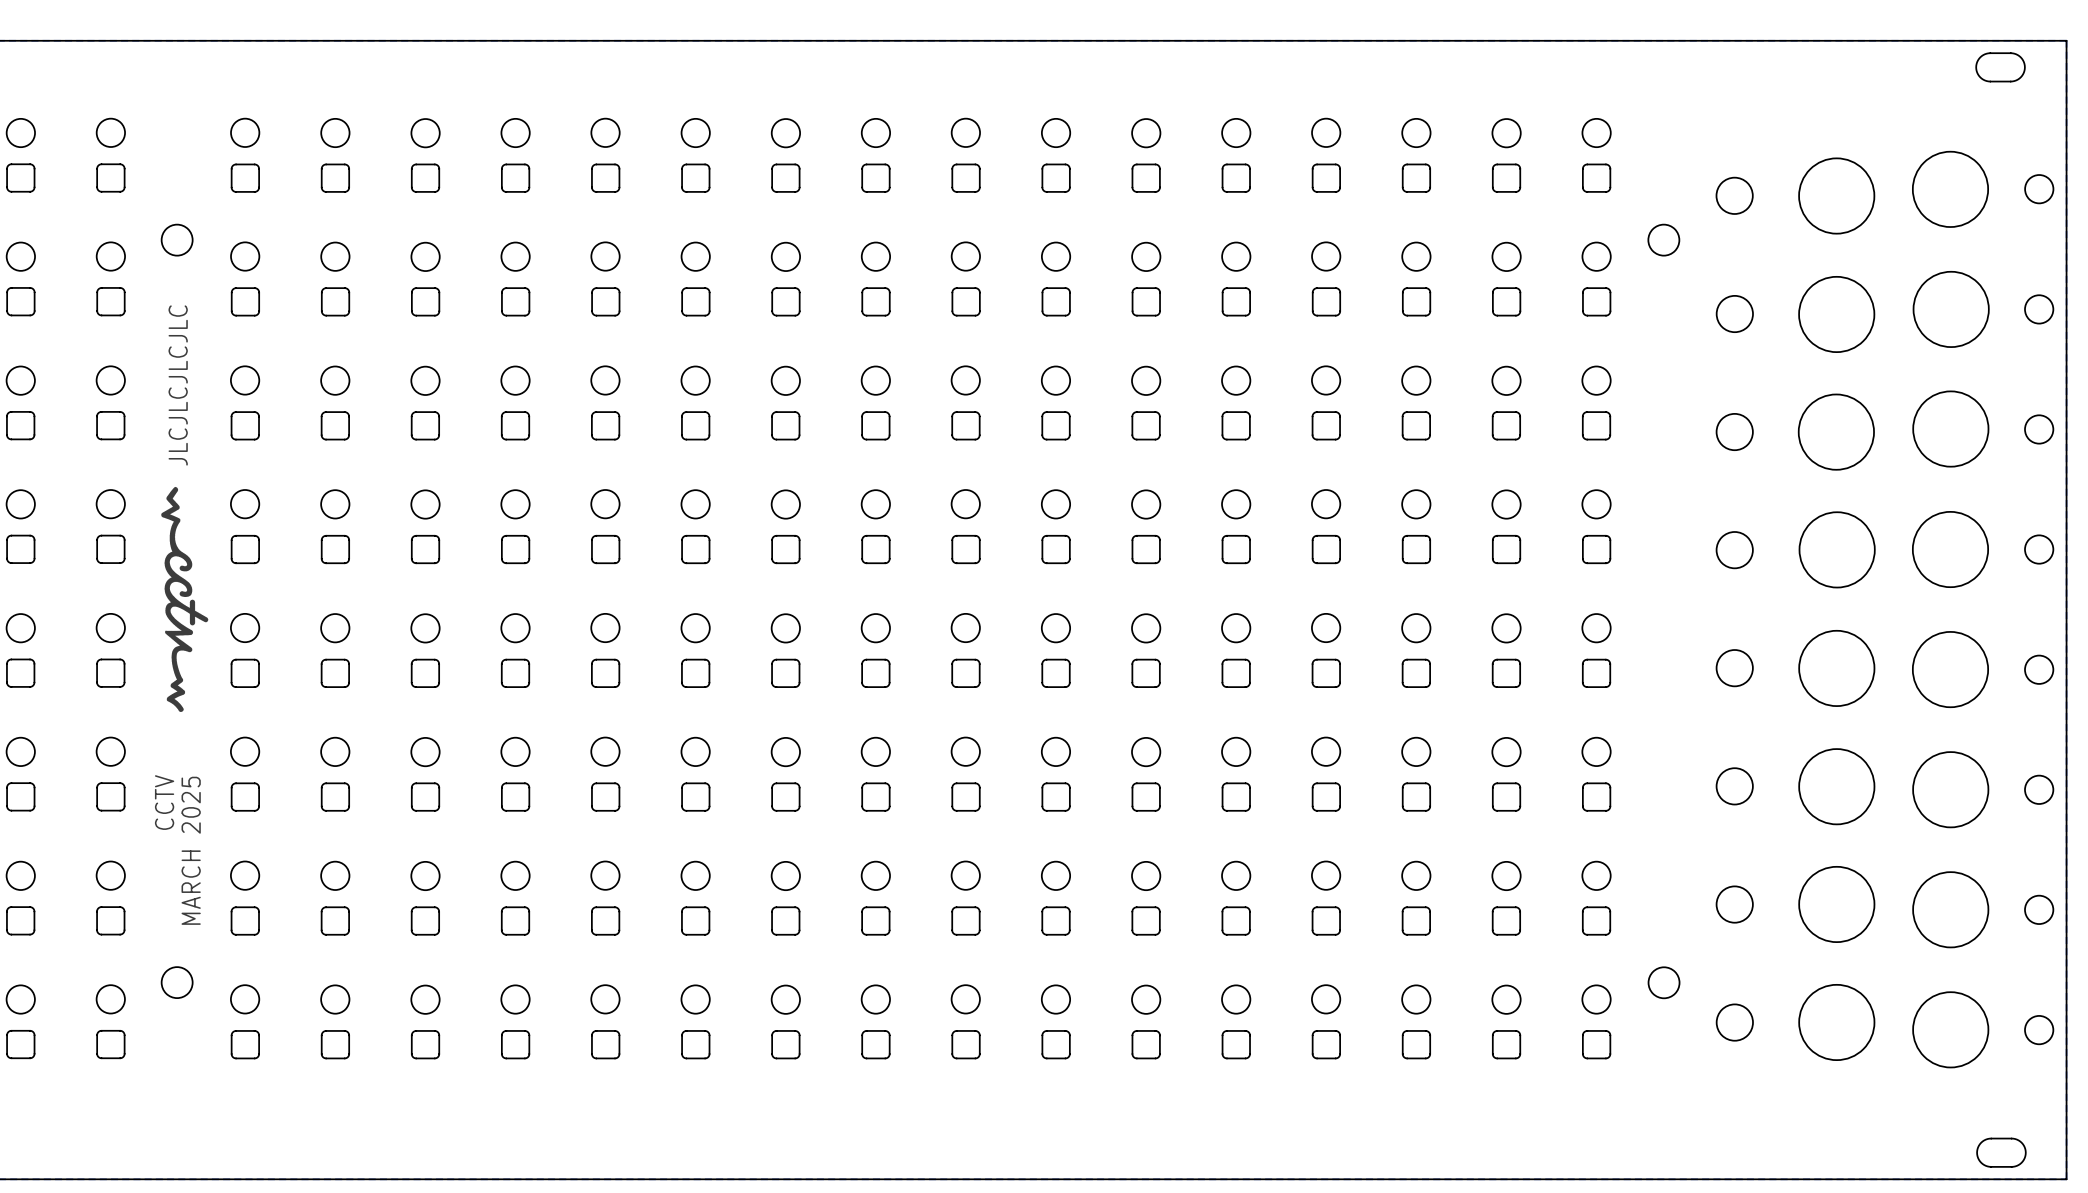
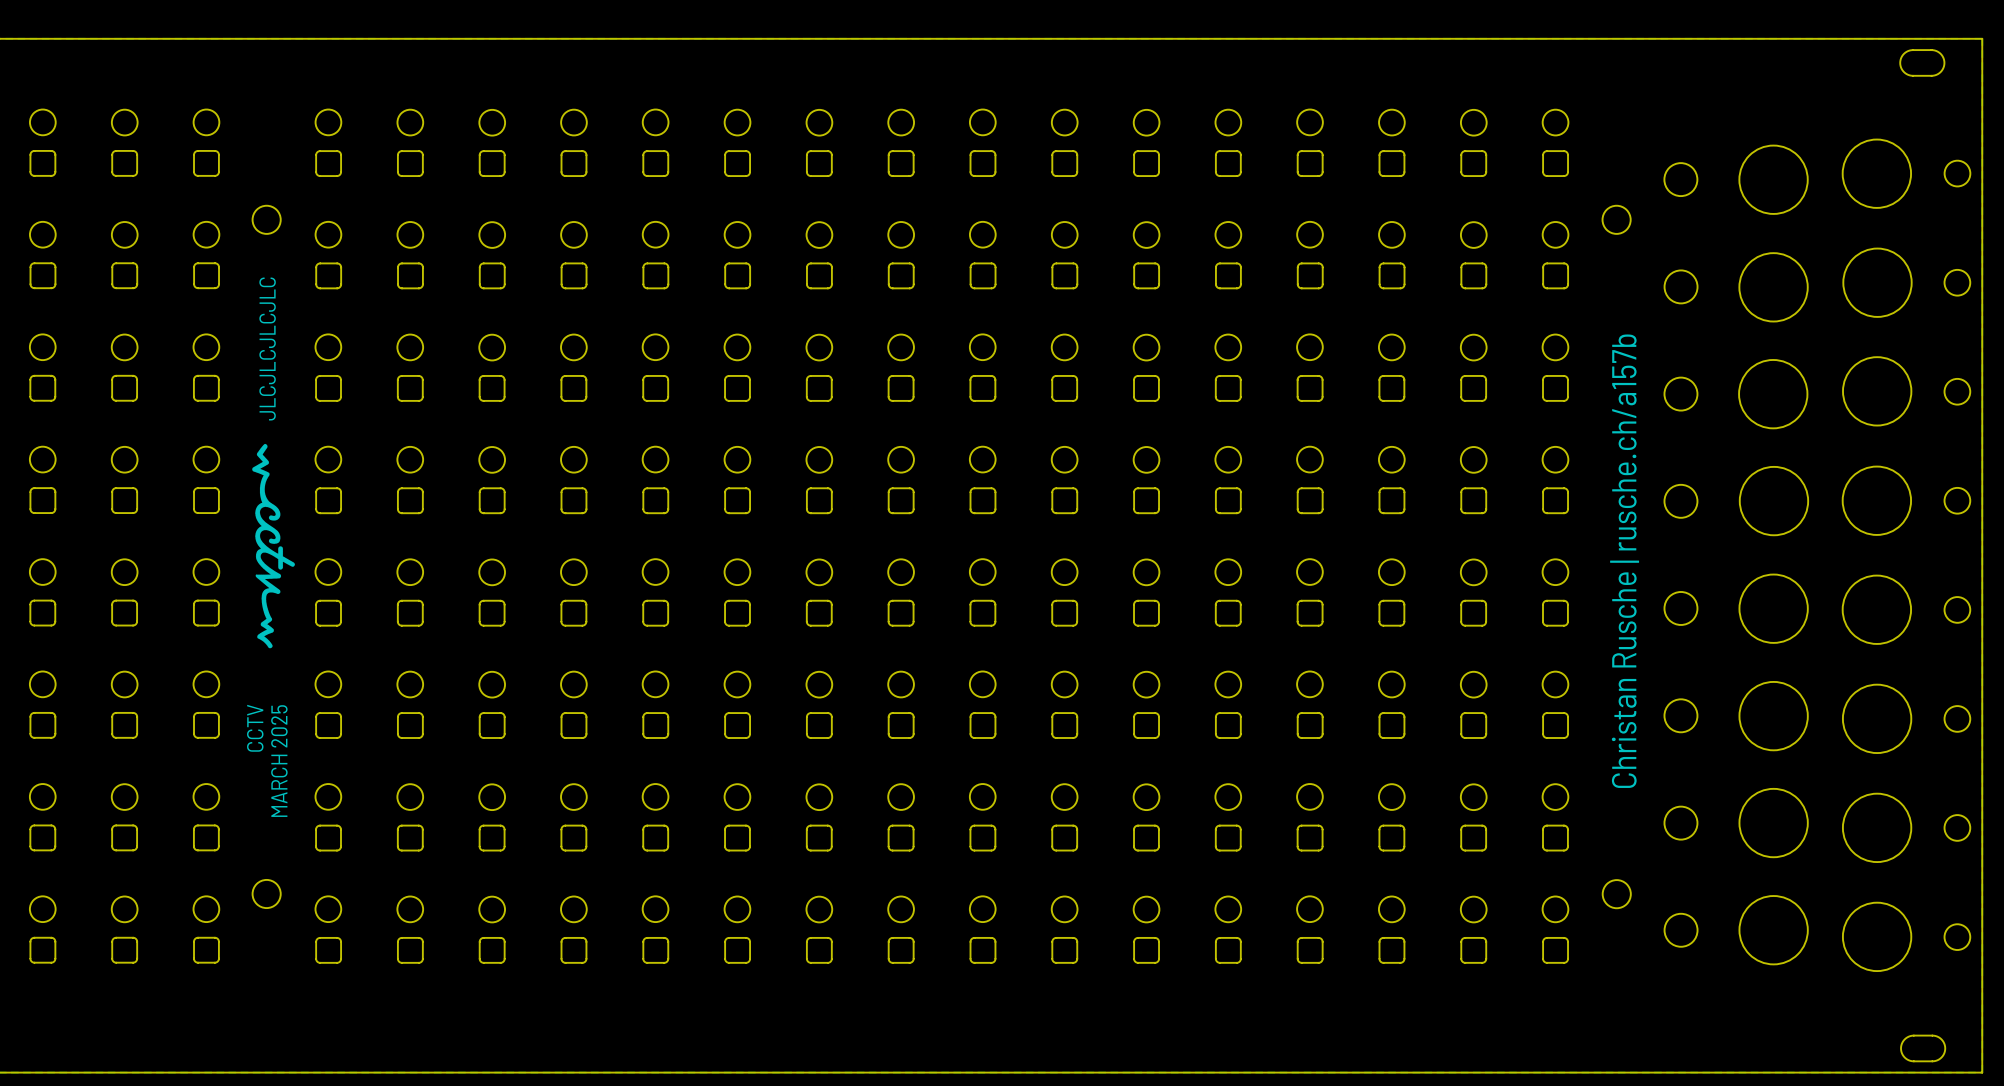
text: none -> Christan Rusche | rusche.ch/a157b (1624, 561)

